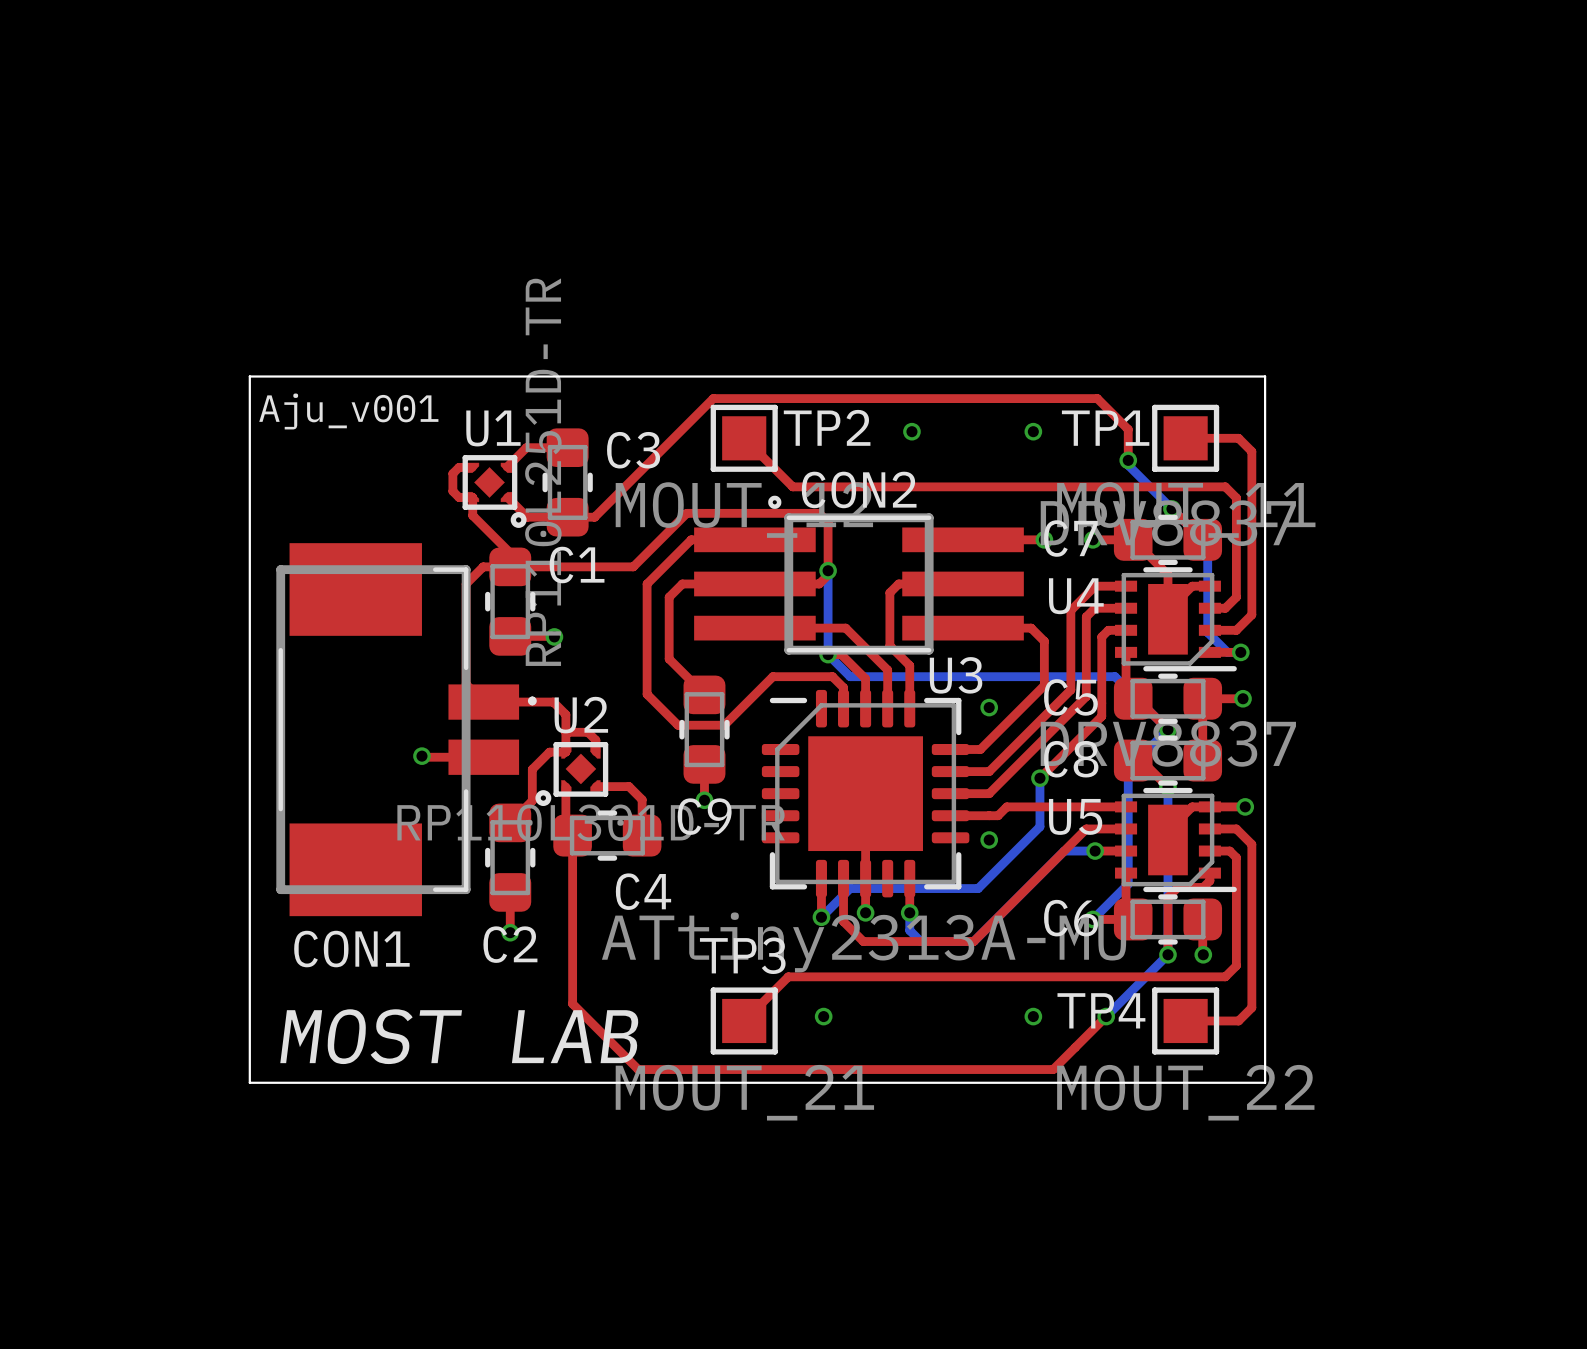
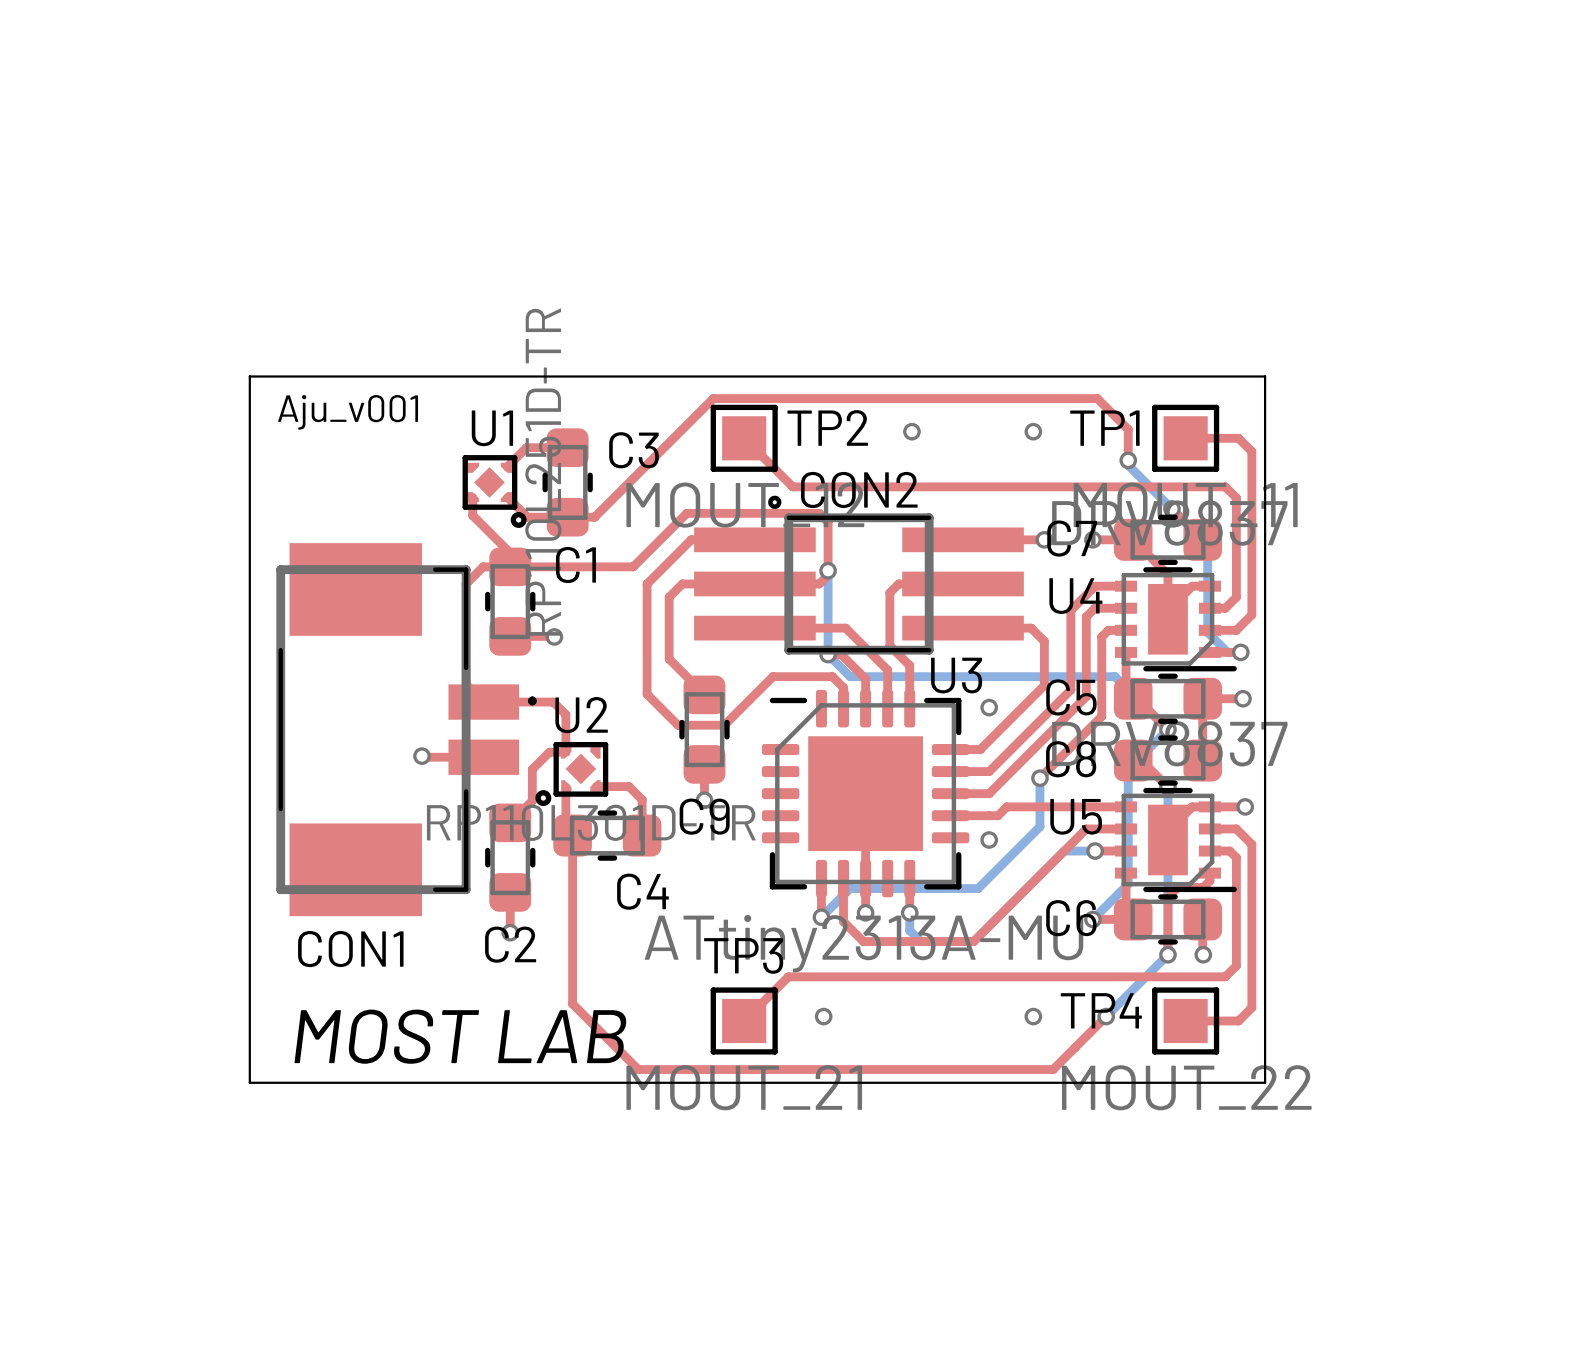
top track: (472, 467) (459, 467) (452, 473) (452, 491) (459, 497) (472, 497) -> none
top track: (565, 732) (587, 732) (595, 740) (595, 751) -> none

